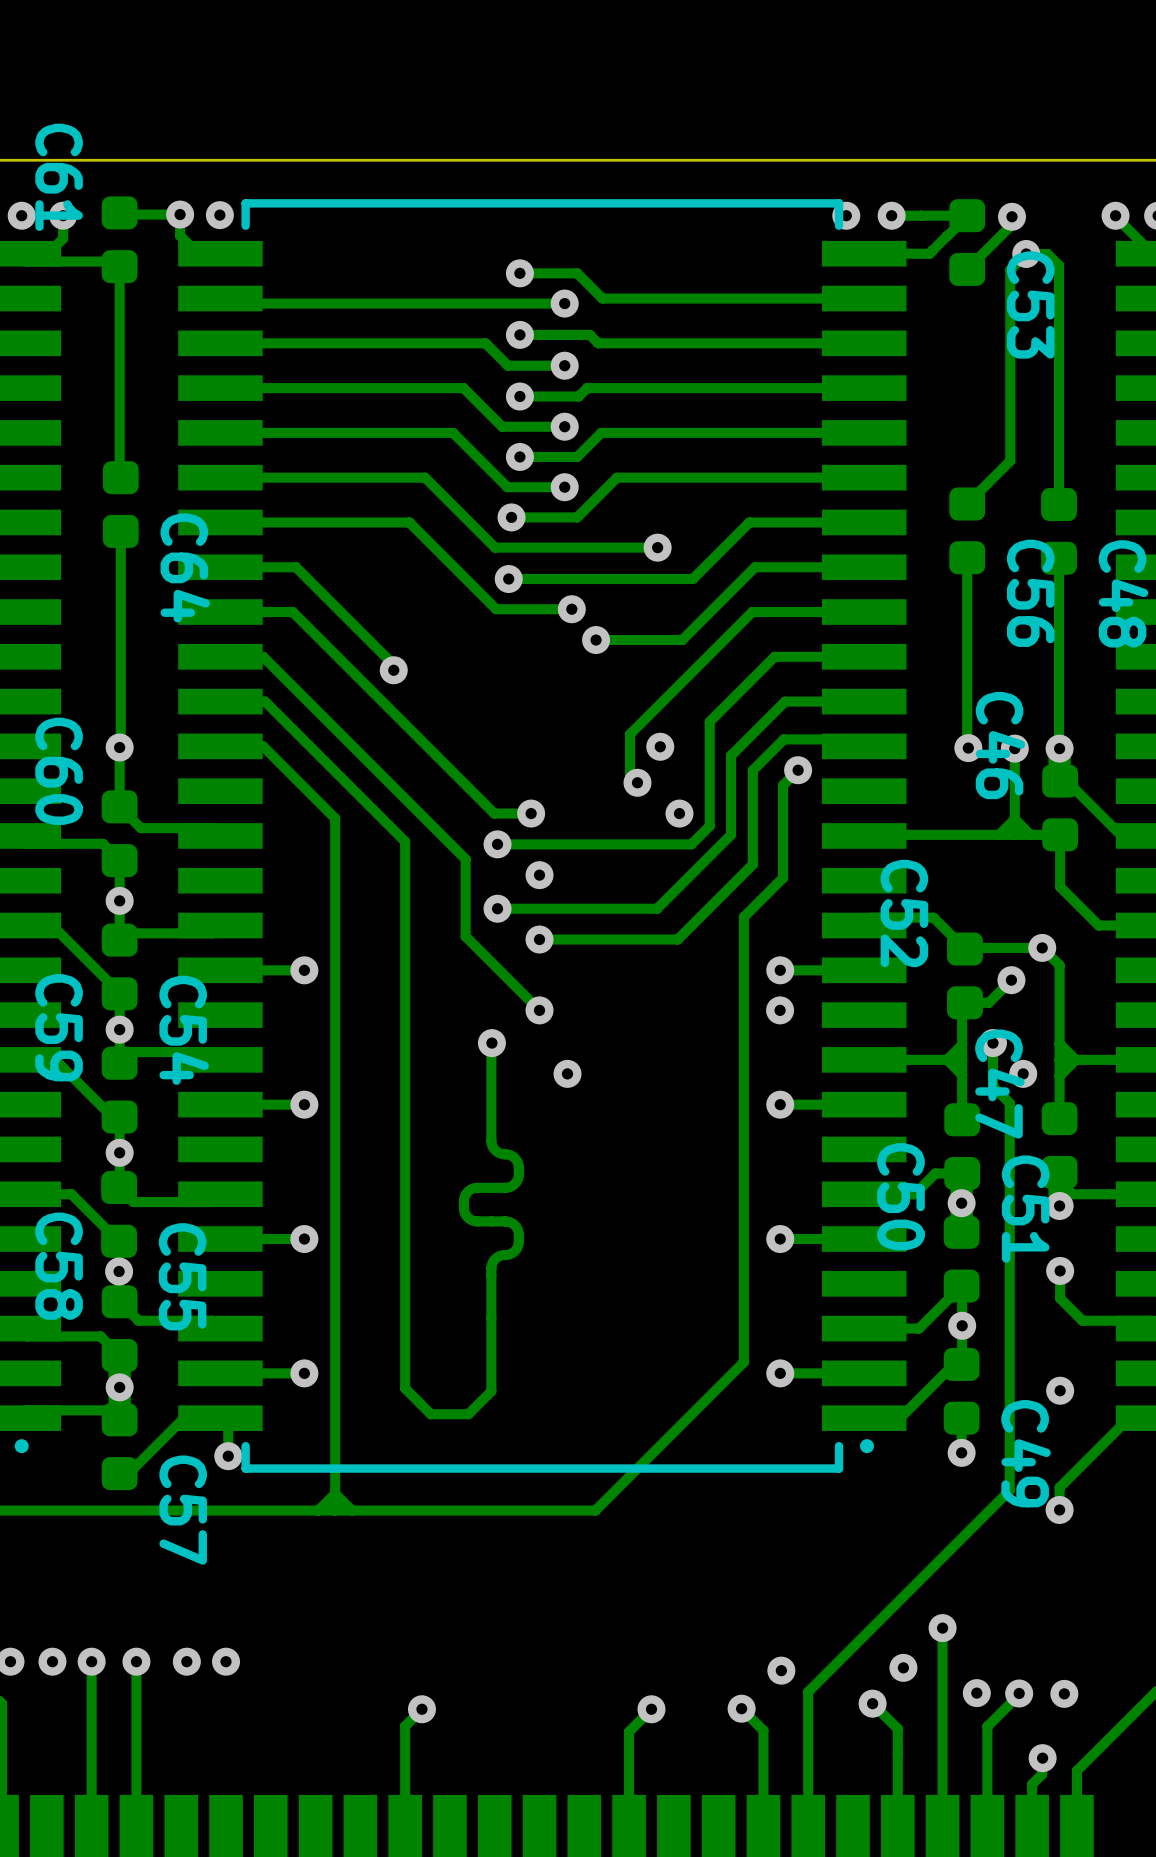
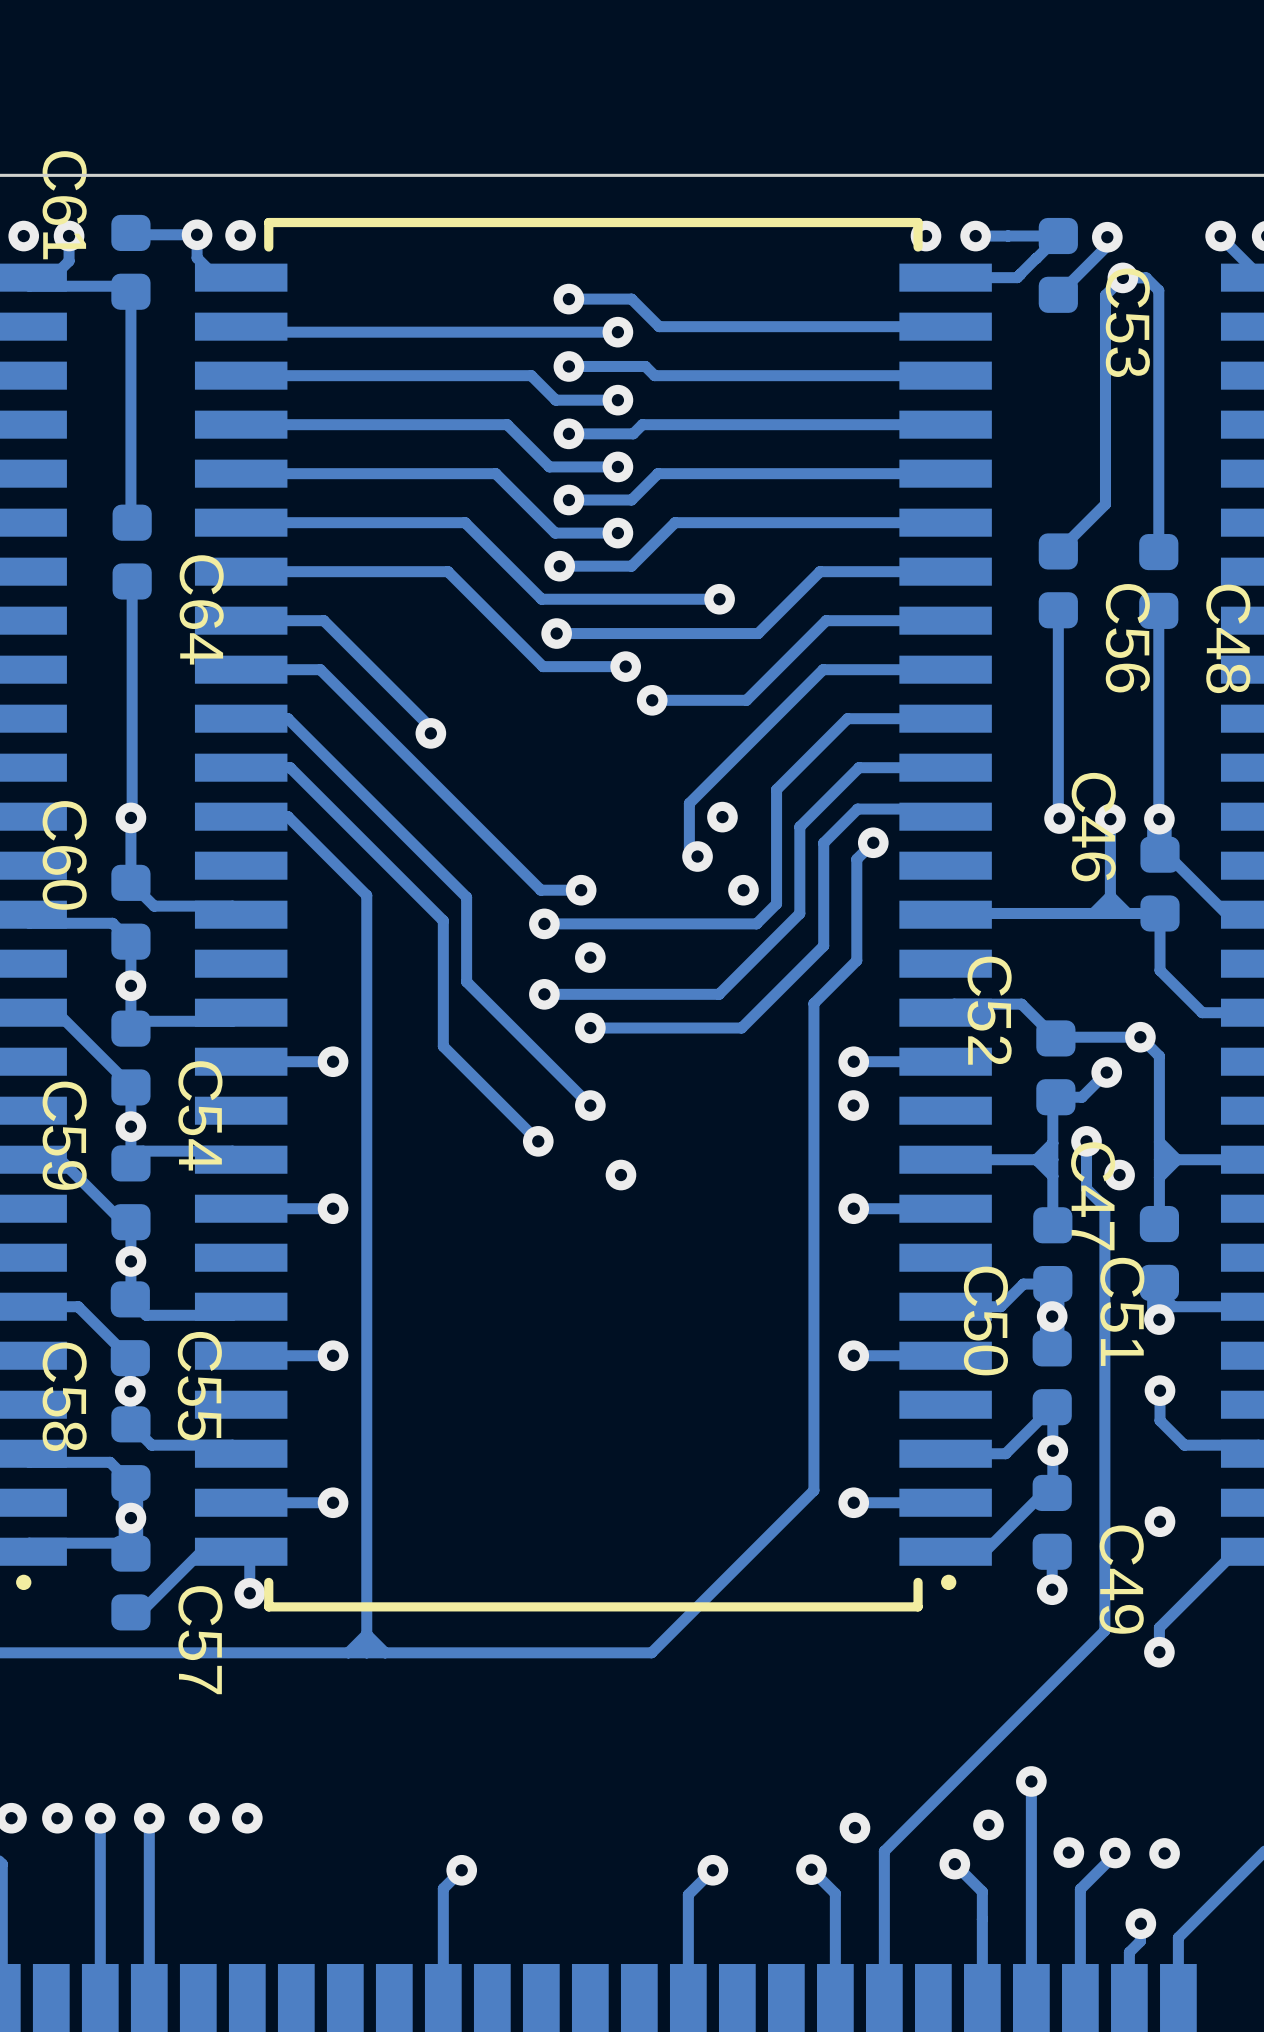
track: (426, 820) (465, 859) (465, 936) -> (466, 897) (466, 981) (509, 1024)
track: (405, 956) (405, 1388) (430, 1414) (468, 1414) (491, 1391) (491, 1266) (495, 1258) (504, 1255) -> (443, 1046) (538, 1141)
track: (491, 1043) (491, 1142) (495, 1150) (504, 1154) -> none
track: (505, 1154) (512, 1156) (518, 1163) (518, 1175) (515, 1182) (506, 1187) (472, 1188) (466, 1194) (463, 1201) (464, 1212) (471, 1220) (506, 1221) (515, 1226) (518, 1233) (518, 1246) (513, 1252) (505, 1255) -> none

